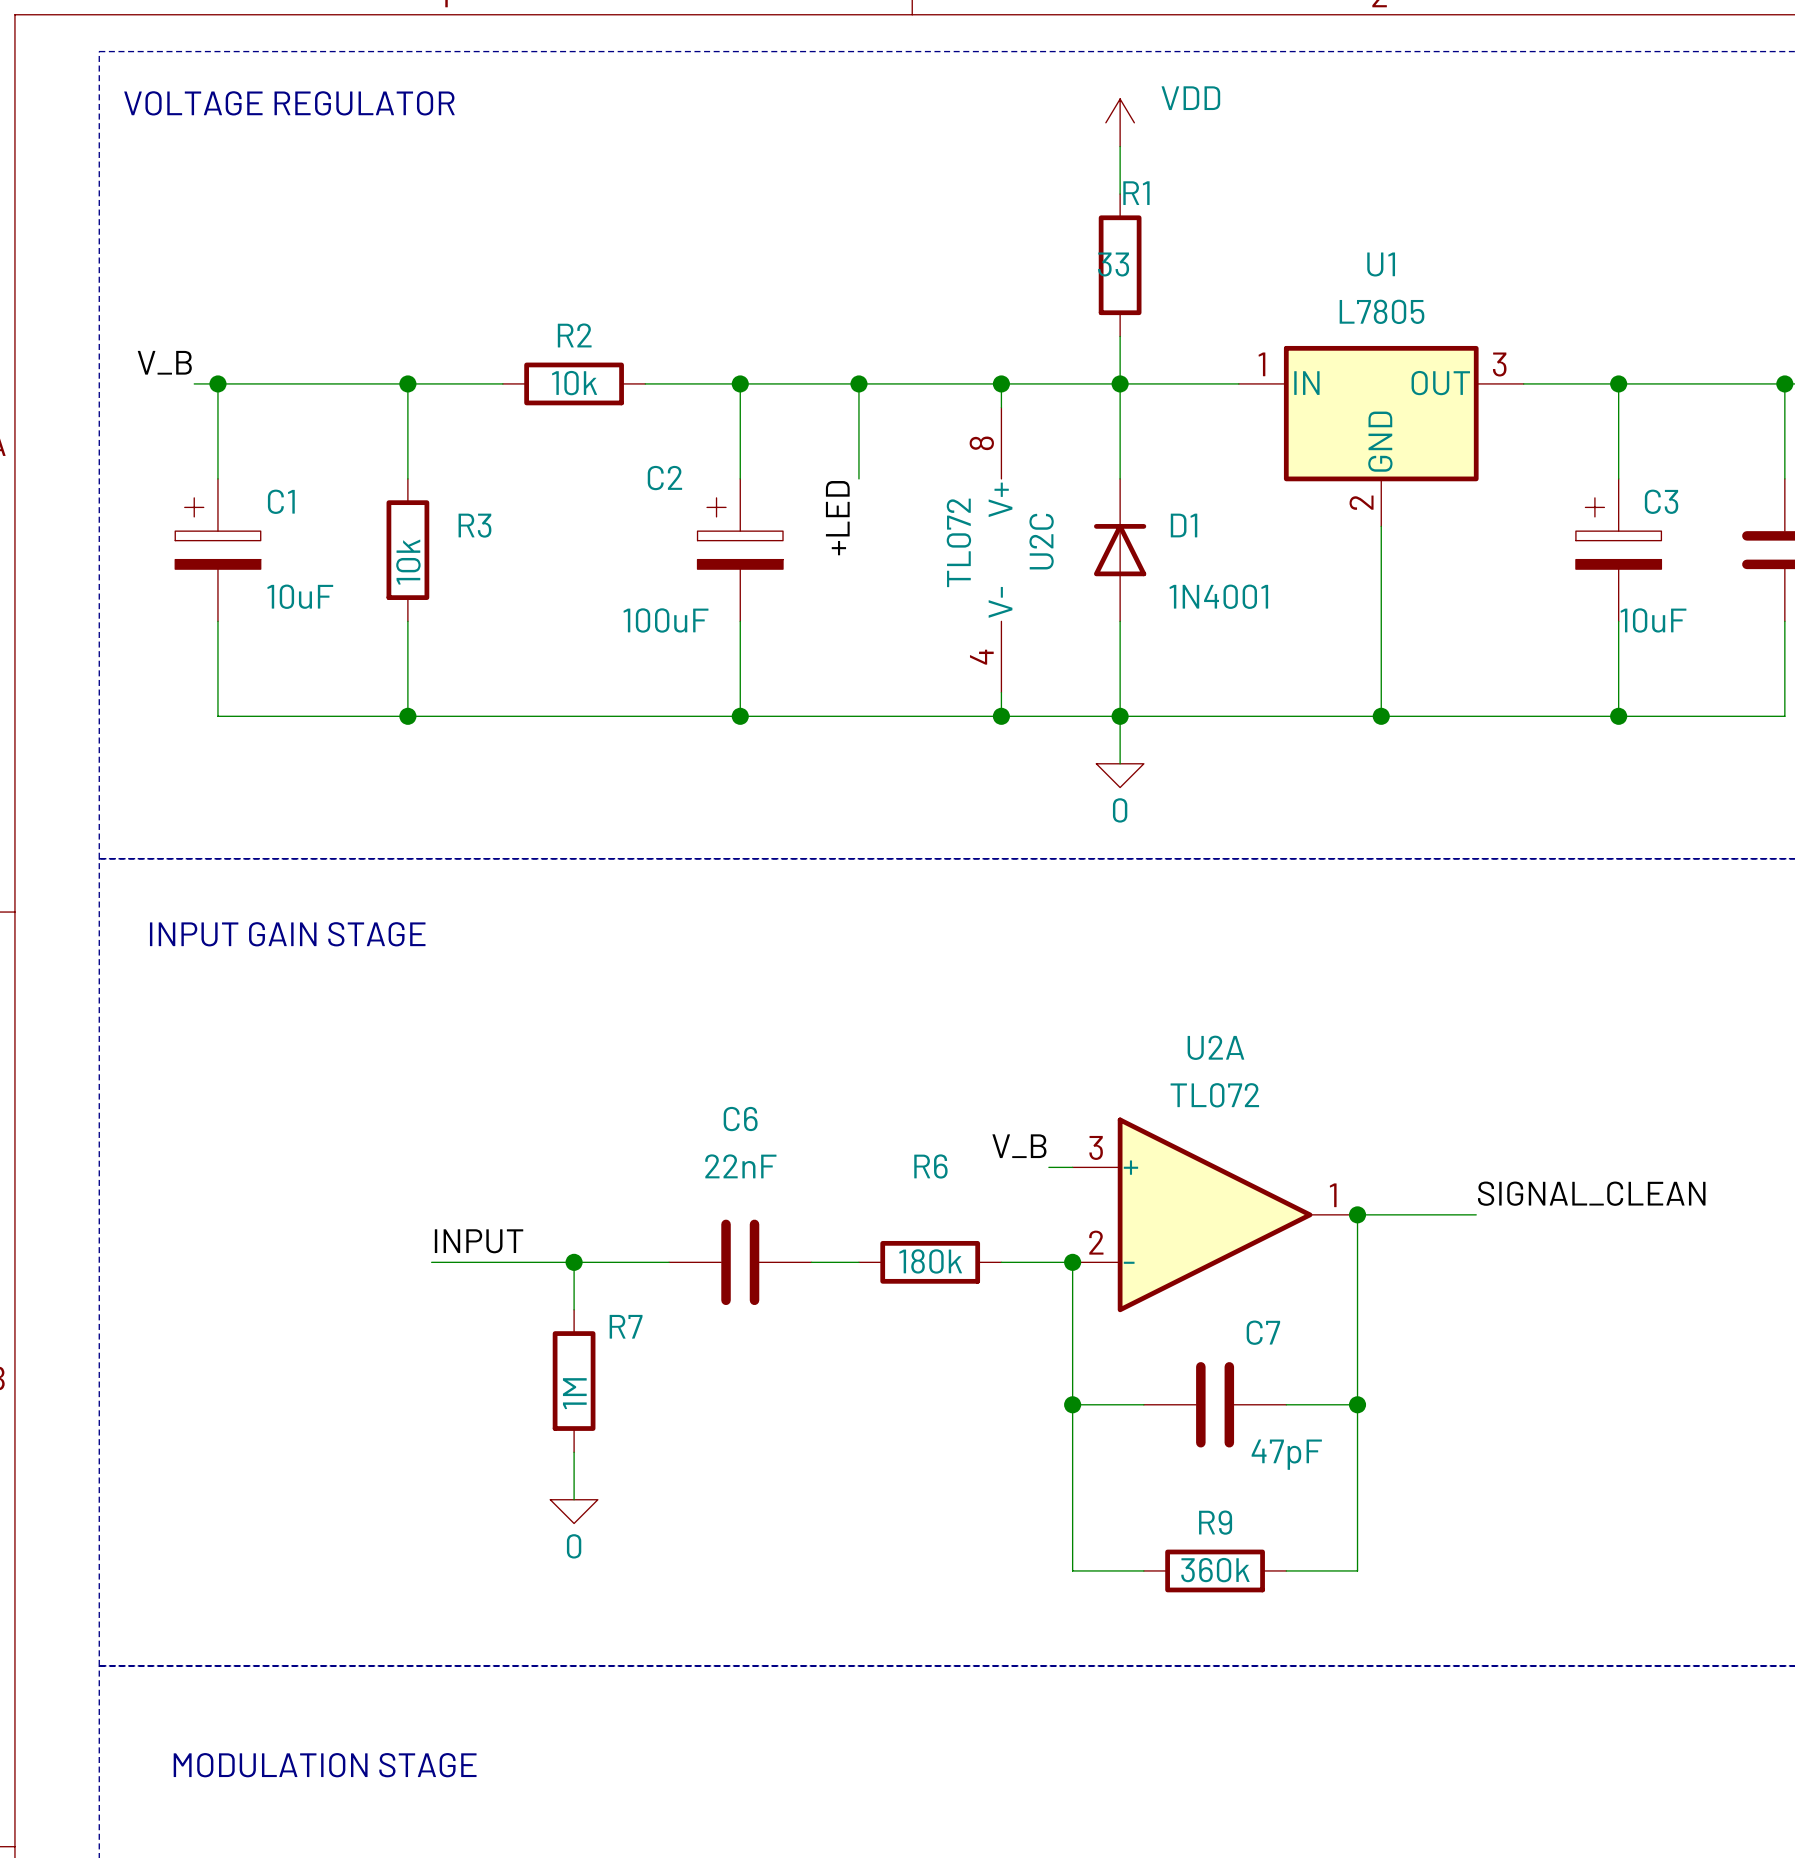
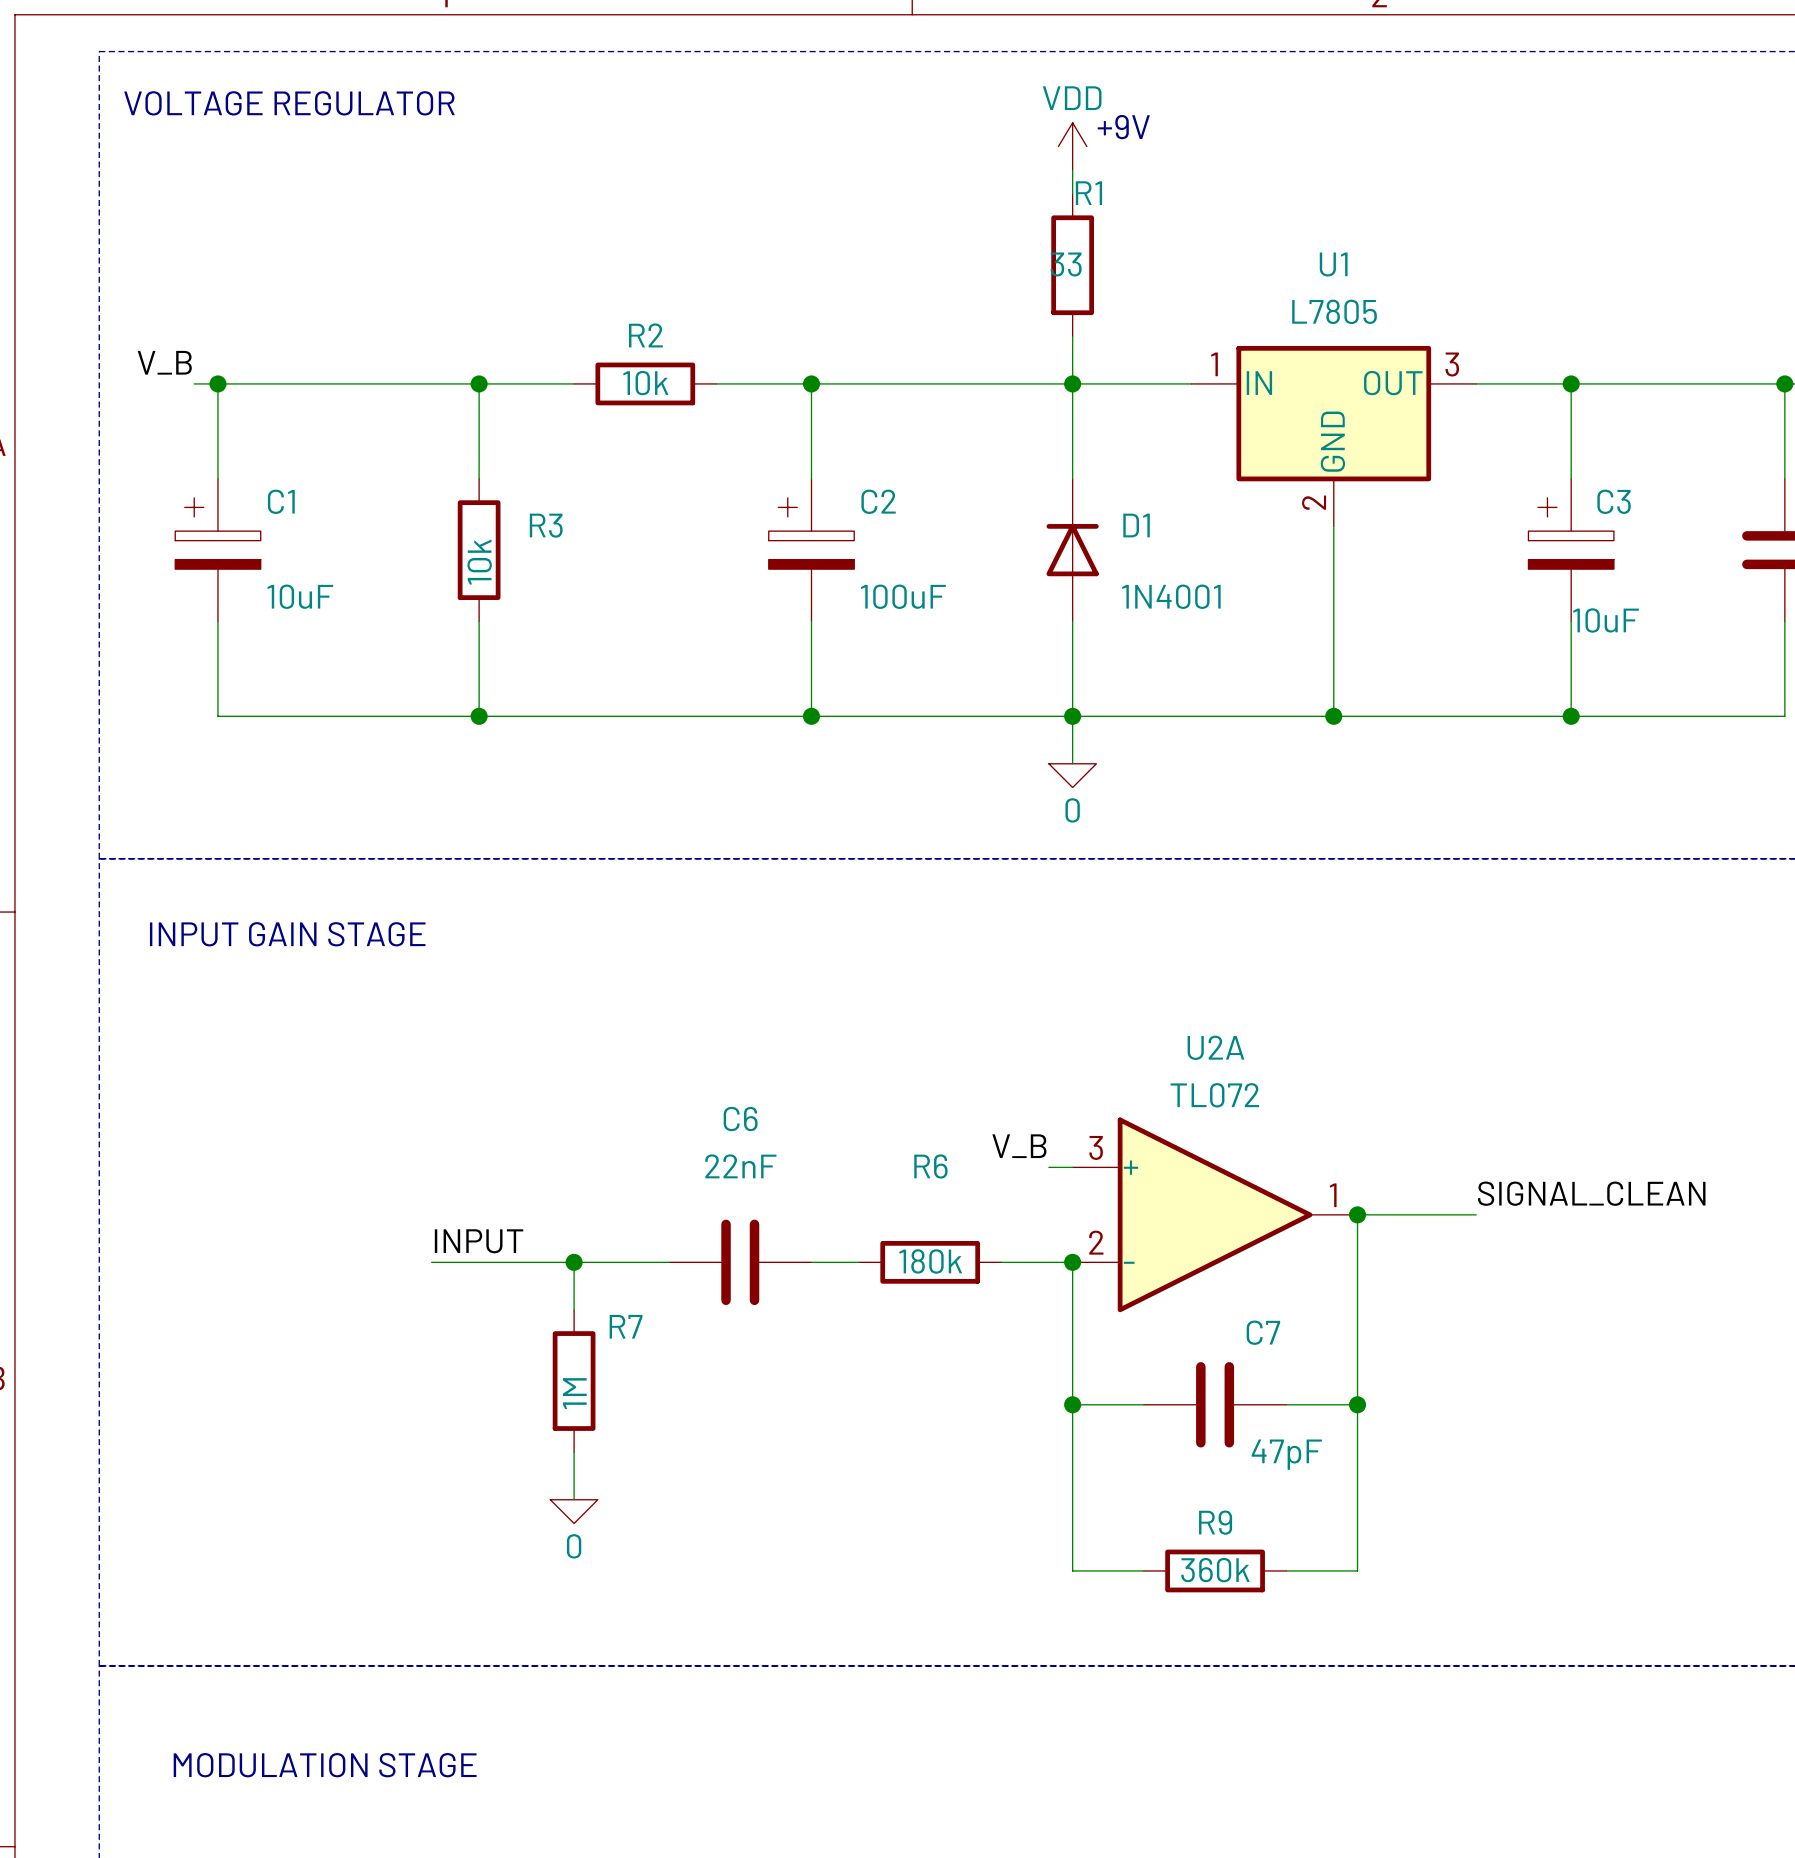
power symbol text position: VDD (1190, 98) -> VDD (1072, 98)
power symbol position: VDD (1120, 122) -> VDD (1072, 146)
text: none -> +9V (1123, 127)
wire: (1120, 146) (1120, 194) -> none
R1 position: (1120, 265) -> (1072, 265)
wire: (1120, 336) (1120, 478) -> (1072, 336) (1072, 478)
wire: (407, 383) (407, 478) -> (479, 383) (479, 478)
junction position: (407, 383) -> (479, 383)
R2 position: (574, 383) -> (645, 383)
wire: (645, 383) (716, 383) -> (502, 383) (574, 383)
wire: (740, 383) (740, 478) -> none
junction: (740, 383) -> none
junction: none -> (811, 383)
wire: (858, 383) (858, 478) -> (811, 383) (811, 478)
junction: (858, 383) -> none
wire: (1001, 383) (1001, 407) -> (1072, 170) (1072, 194)
junction: (1001, 383) -> none
junction: none -> (1072, 383)
junction: (1120, 383) -> none
wire: (1618, 383) (1618, 478) -> (1571, 383) (1571, 478)
junction position: (1618, 383) -> (1571, 383)
U1 position: (1381, 436) -> (1333, 436)
C2 name position: C2 (664, 478) -> C2 (878, 501)
label: +LED (837, 518) -> none
wire: (1381, 526) (1381, 716) -> (1333, 526) (1333, 716)
R3 position: (407, 550) -> (479, 550)
C2 position: (740, 550) -> (811, 550)
U2C: TL072 (1001, 550) -> none
D1 position: (1120, 550) -> (1072, 550)
C3 position: (1618, 550) -> (1571, 550)
C2 value position: 100uF (665, 620) -> 100uF (903, 596)
wire: (407, 621) (407, 716) -> (479, 621) (479, 716)
wire: (740, 621) (740, 716) -> (811, 621) (811, 716)
wire: (1120, 621) (1120, 763) -> (1072, 621) (1072, 763)
wire: (1618, 621) (1618, 716) -> (1571, 621) (1571, 716)
wire: (1001, 692) (1001, 716) -> none
junction position: (407, 716) -> (479, 716)
junction position: (740, 716) -> (811, 716)
junction: (1001, 716) -> none
junction: none -> (1072, 716)
junction: (1120, 716) -> none
junction position: (1381, 716) -> (1333, 716)
junction position: (1618, 716) -> (1571, 716)
power symbol position: 0 (1120, 775) -> 0 (1072, 775)

